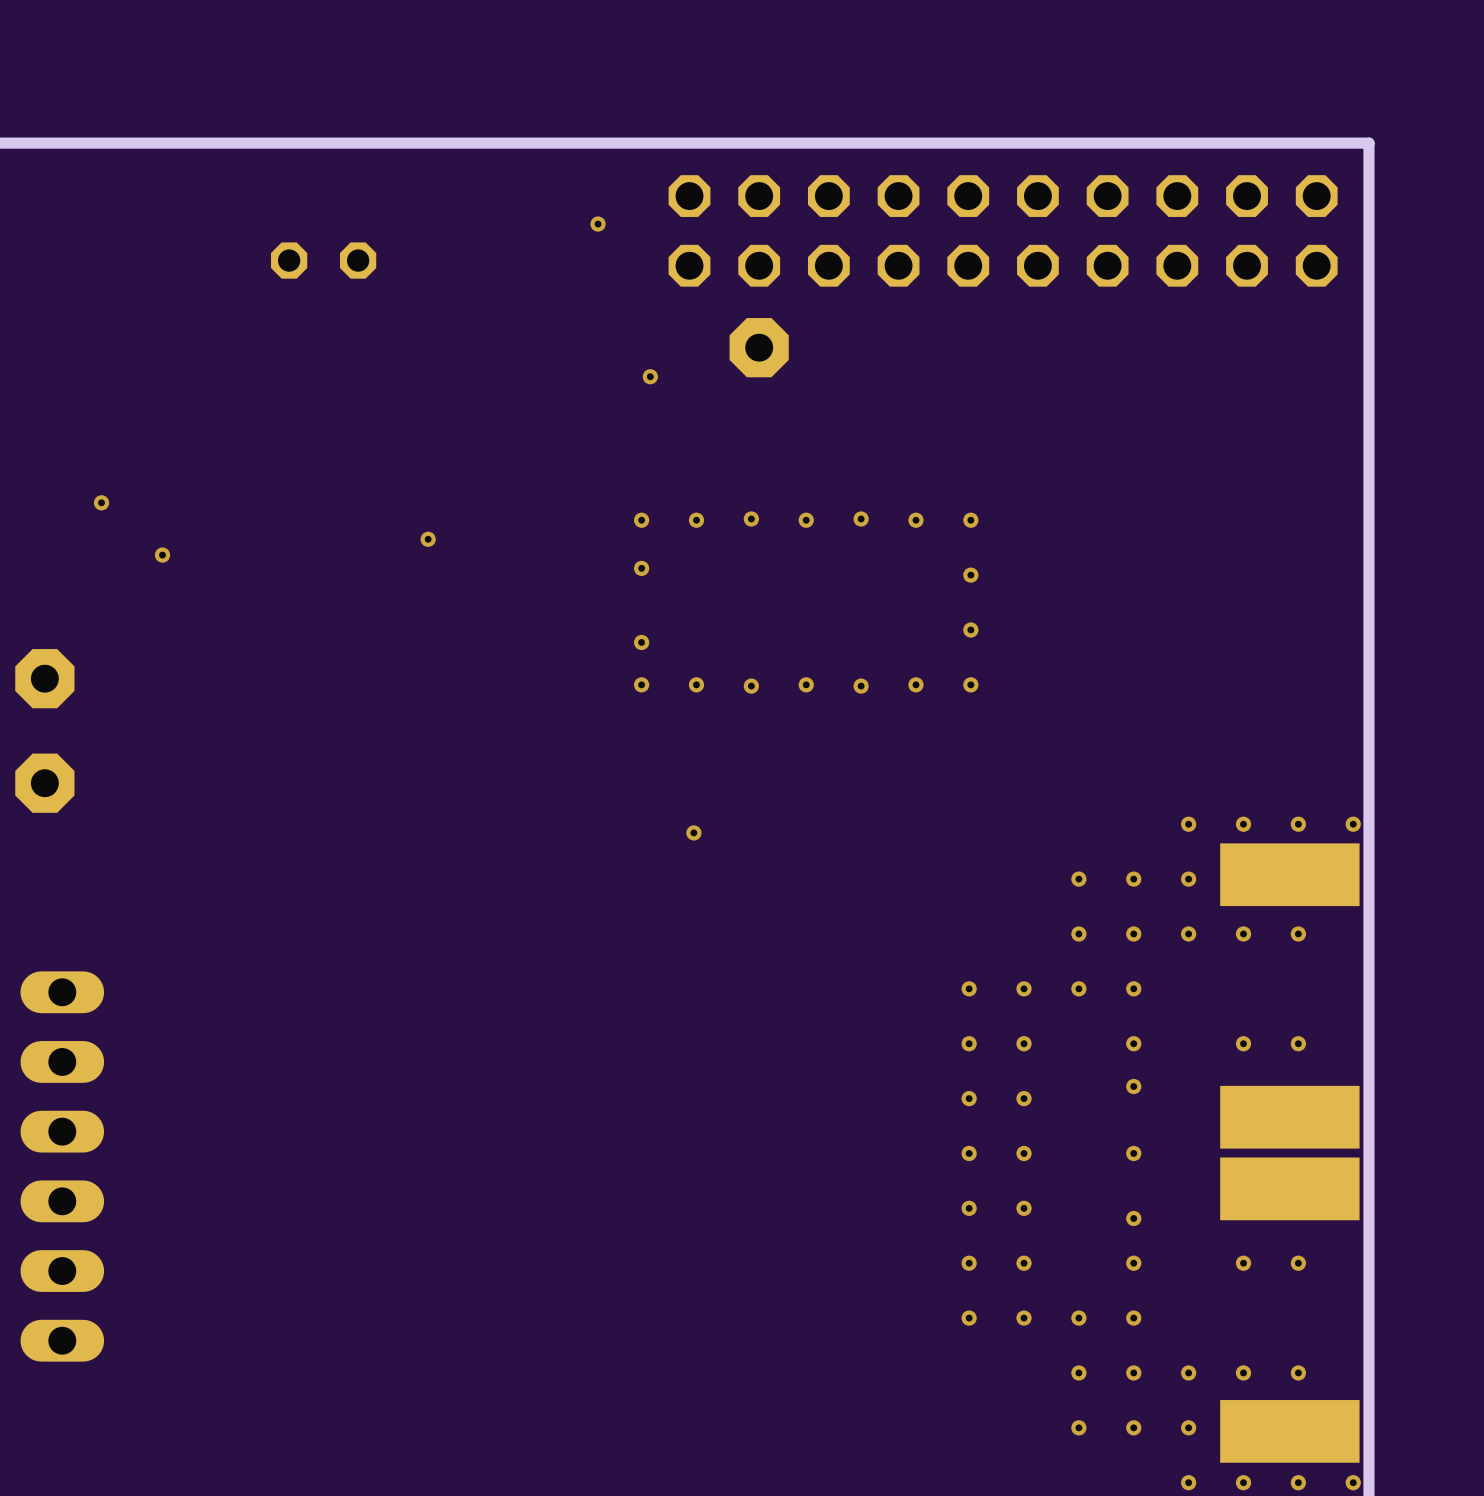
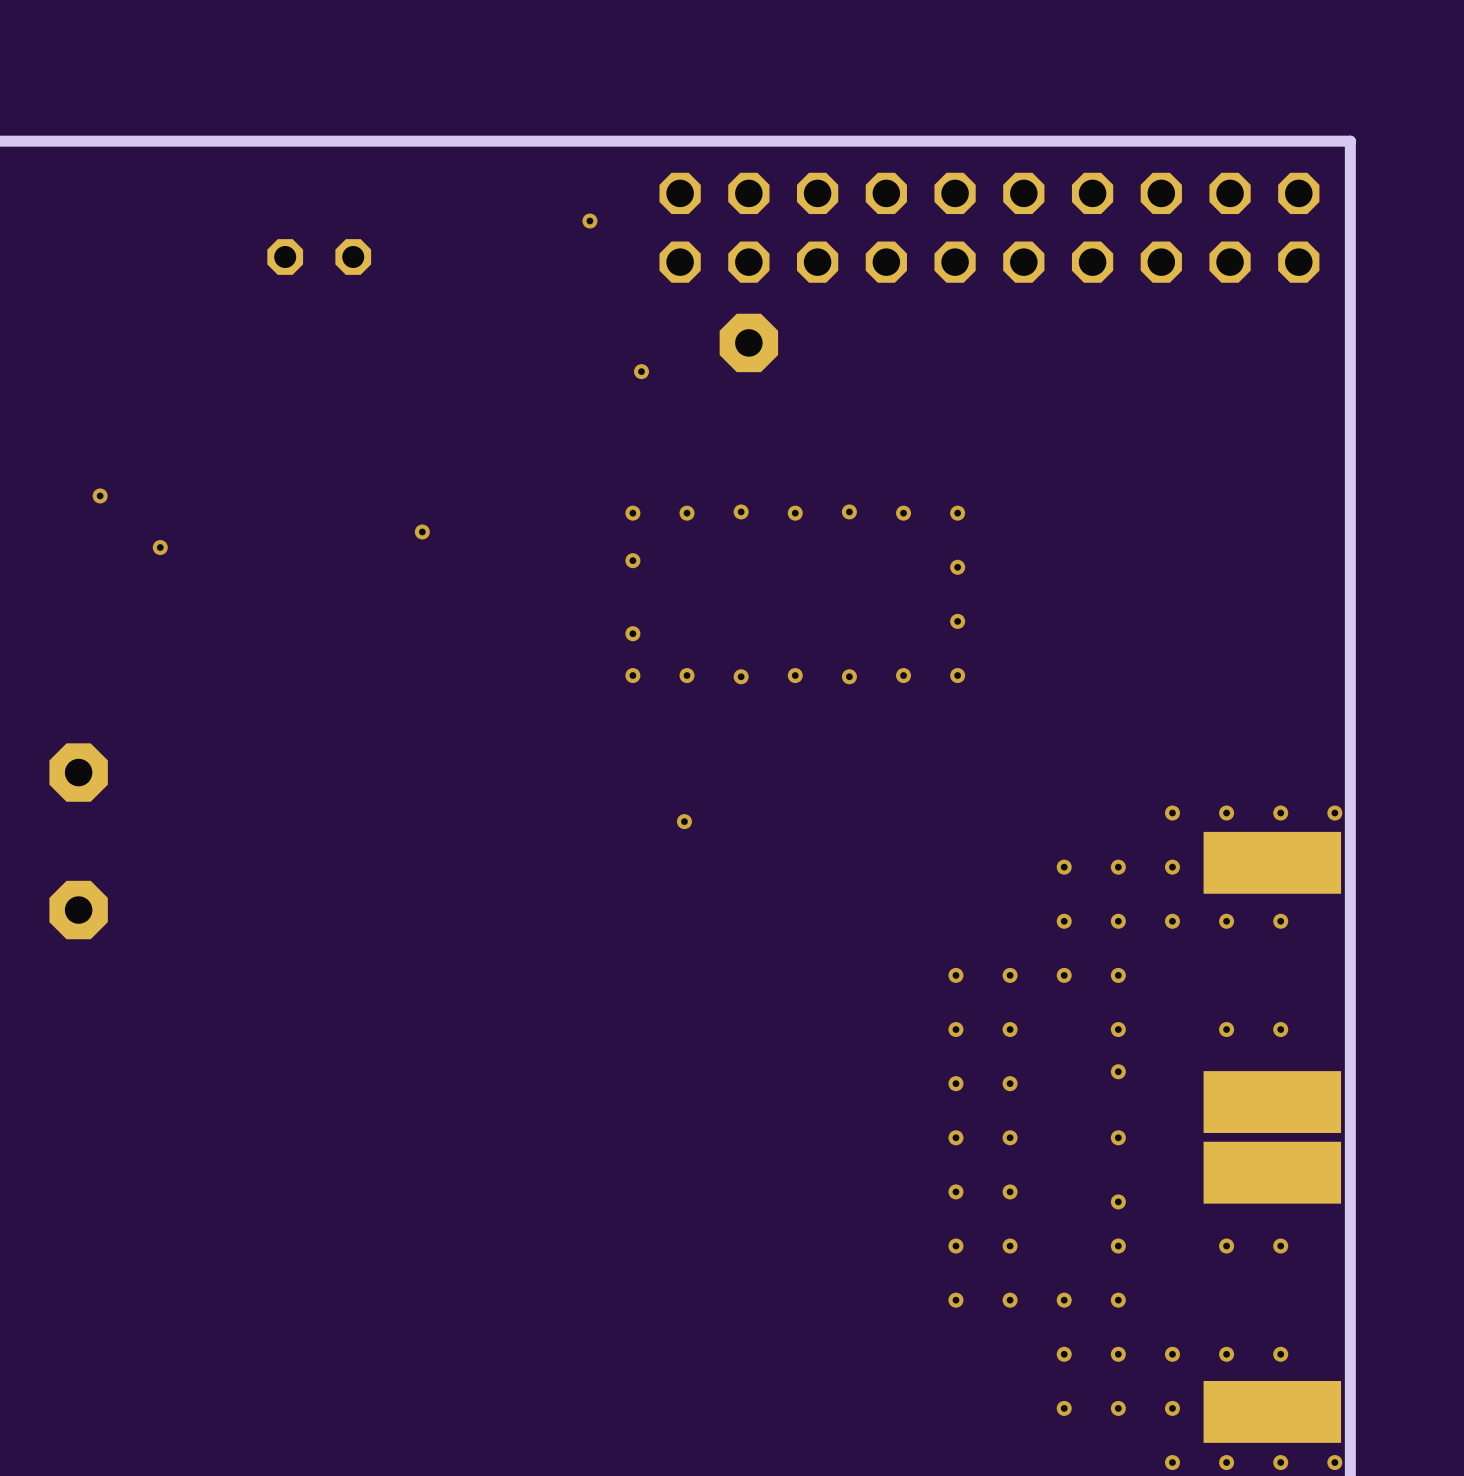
part: (44, 678) -> none
part position: (44, 783) -> (78, 772)
part: none -> (78, 910)
part: (62, 1166) -> none

